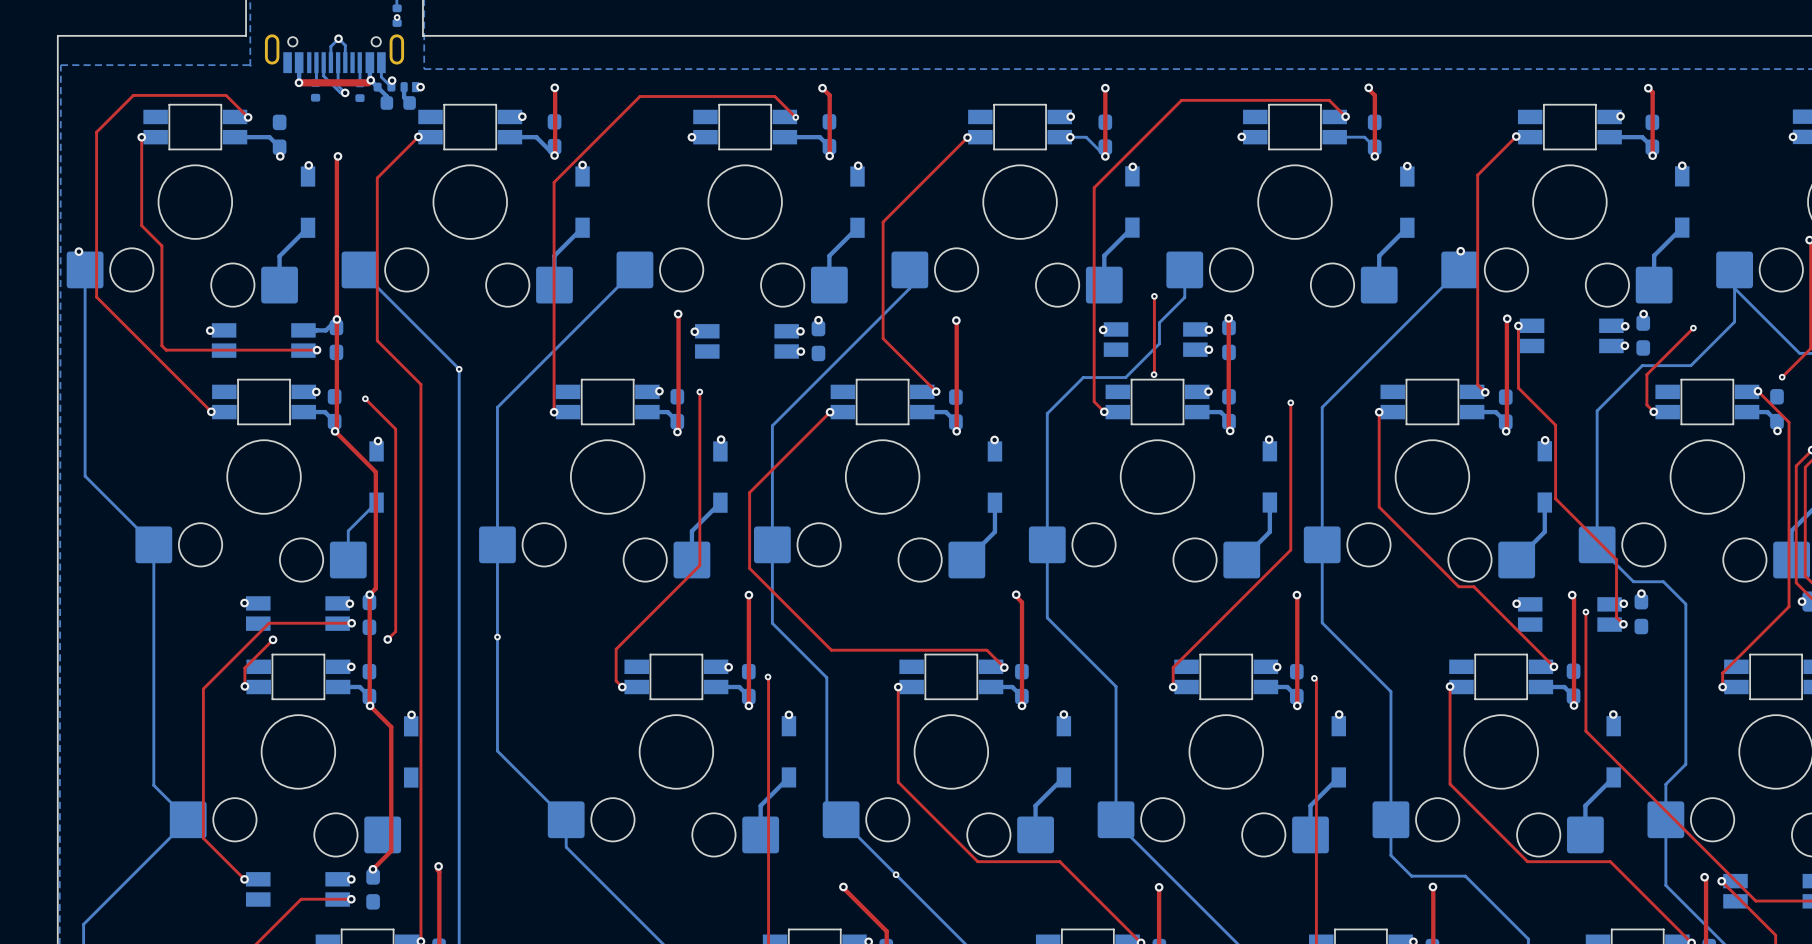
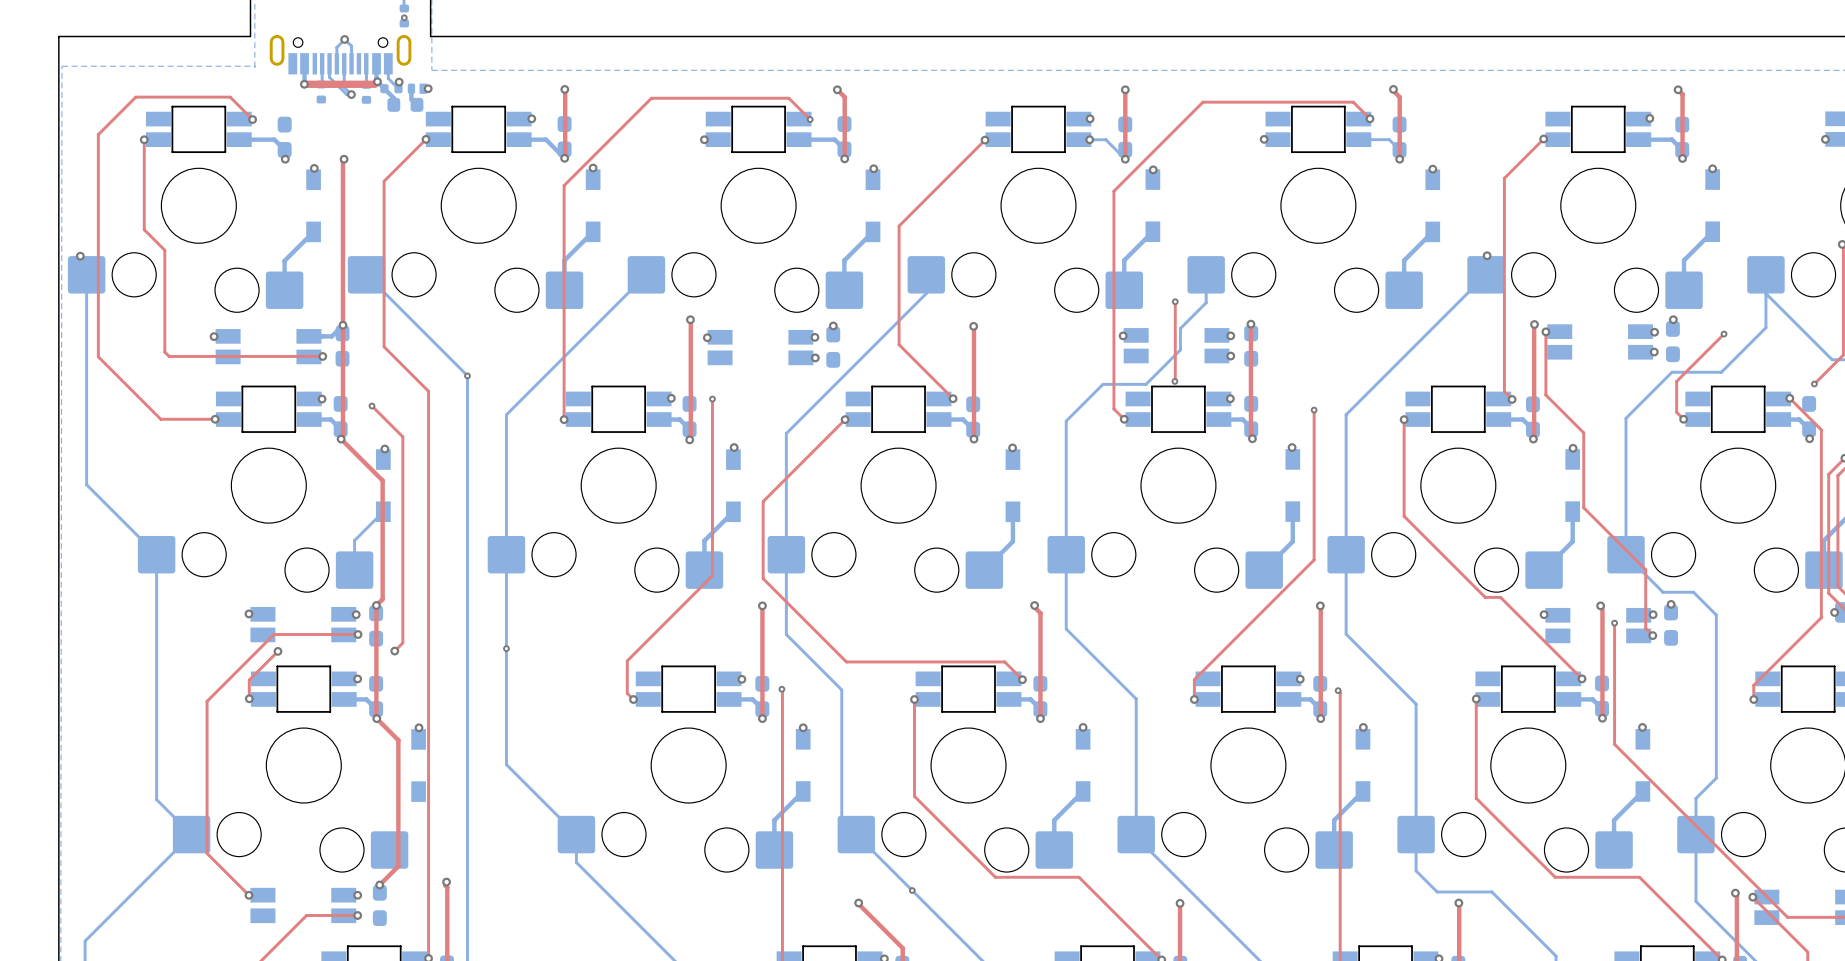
top track: (96, 297) (211, 411) -> (98, 302) (98, 356) (160, 419) (213, 419)

